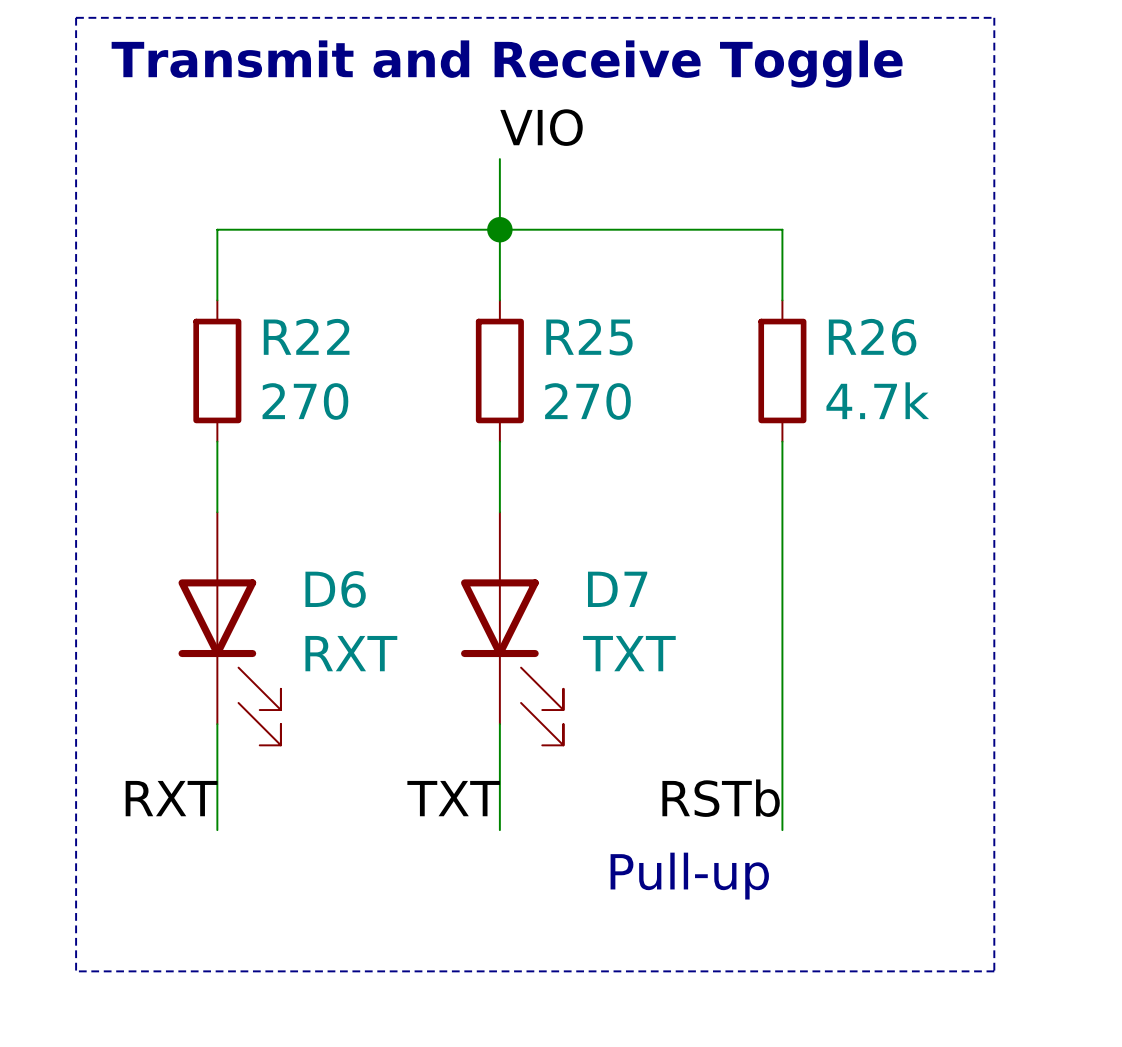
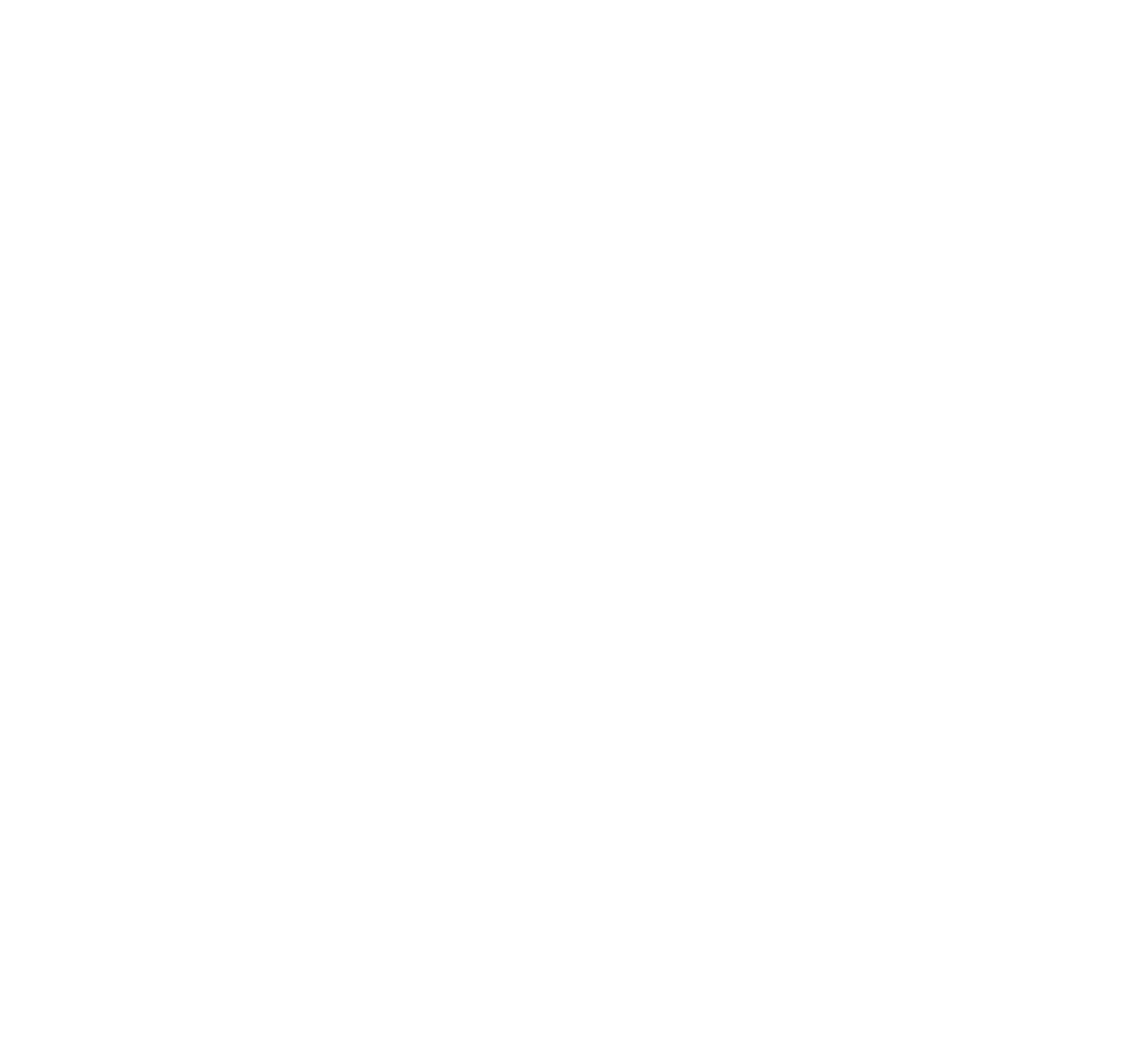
line: (76, 17) (994, 17) (994, 971) (76, 971) (76, 17) -> none
text: Transmit and Receive Toggle (507, 64) -> none
label: VIO (541, 127) -> none
wire: (499, 159) (499, 300) -> none
junction: (499, 229) -> none
wire: (217, 300) (217, 229) (782, 229) (782, 300) -> none
R22: 270 (217, 370) -> none
R25: 270 (499, 370) -> none
R26: 4.7k (782, 370) -> none
wire: (217, 441) (217, 512) -> none
wire: (499, 441) (499, 512) -> none
wire: (782, 441) (782, 830) -> none
D6: RXT (229, 628) -> none
D7: TXT (512, 628) -> none
wire: (217, 724) (217, 830) -> none
wire: (499, 724) (499, 830) -> none
label: RXT (171, 798) -> none
label: TXT (453, 798) -> none
label: RSTb (721, 798) -> none
text: Pull-up (689, 876) -> none

